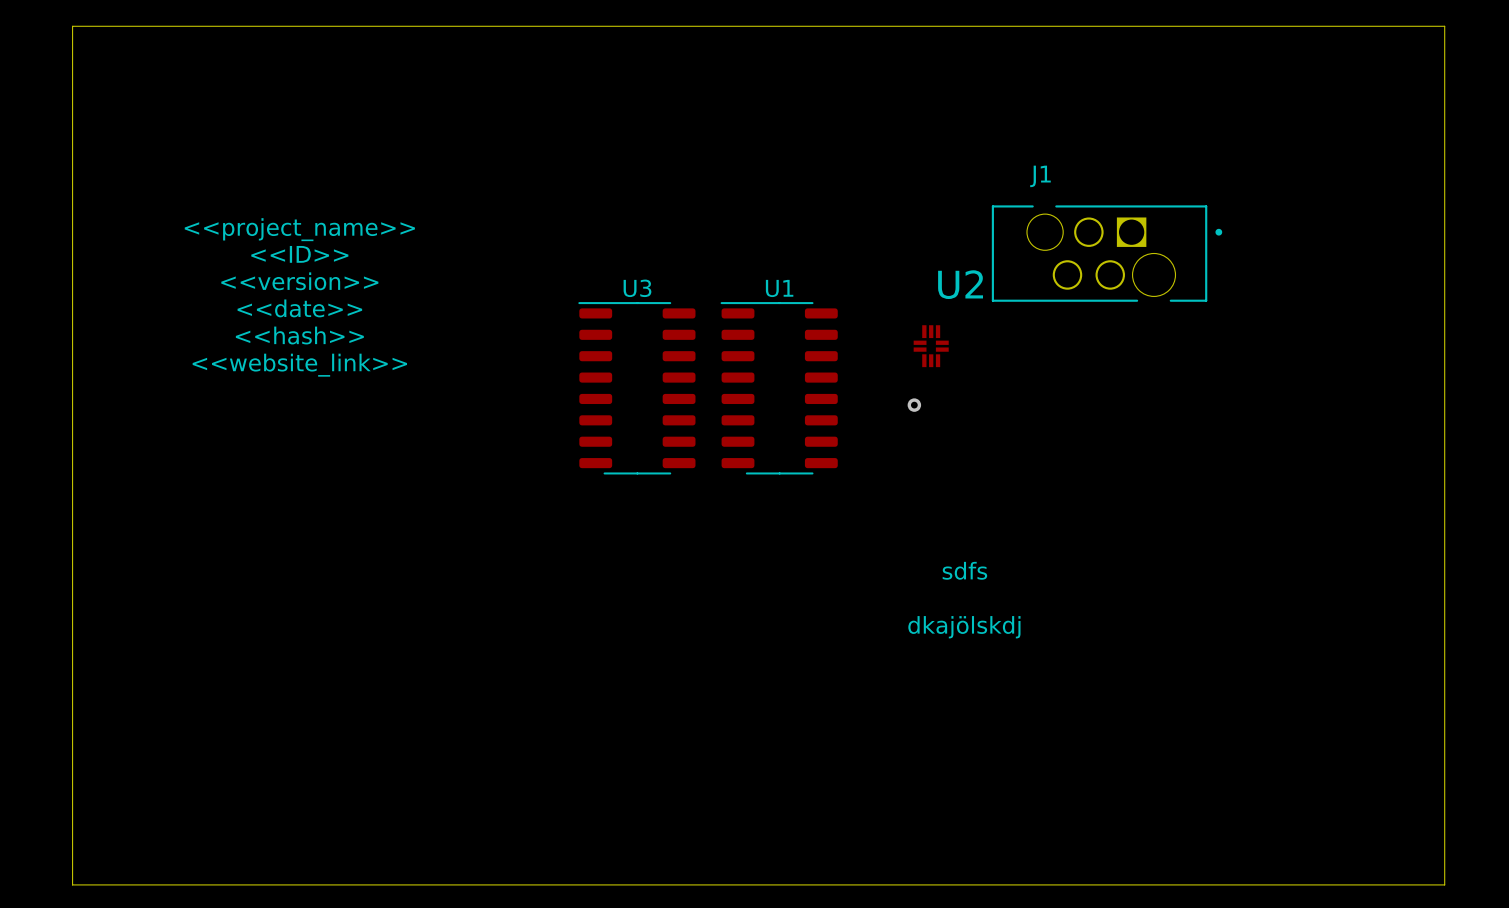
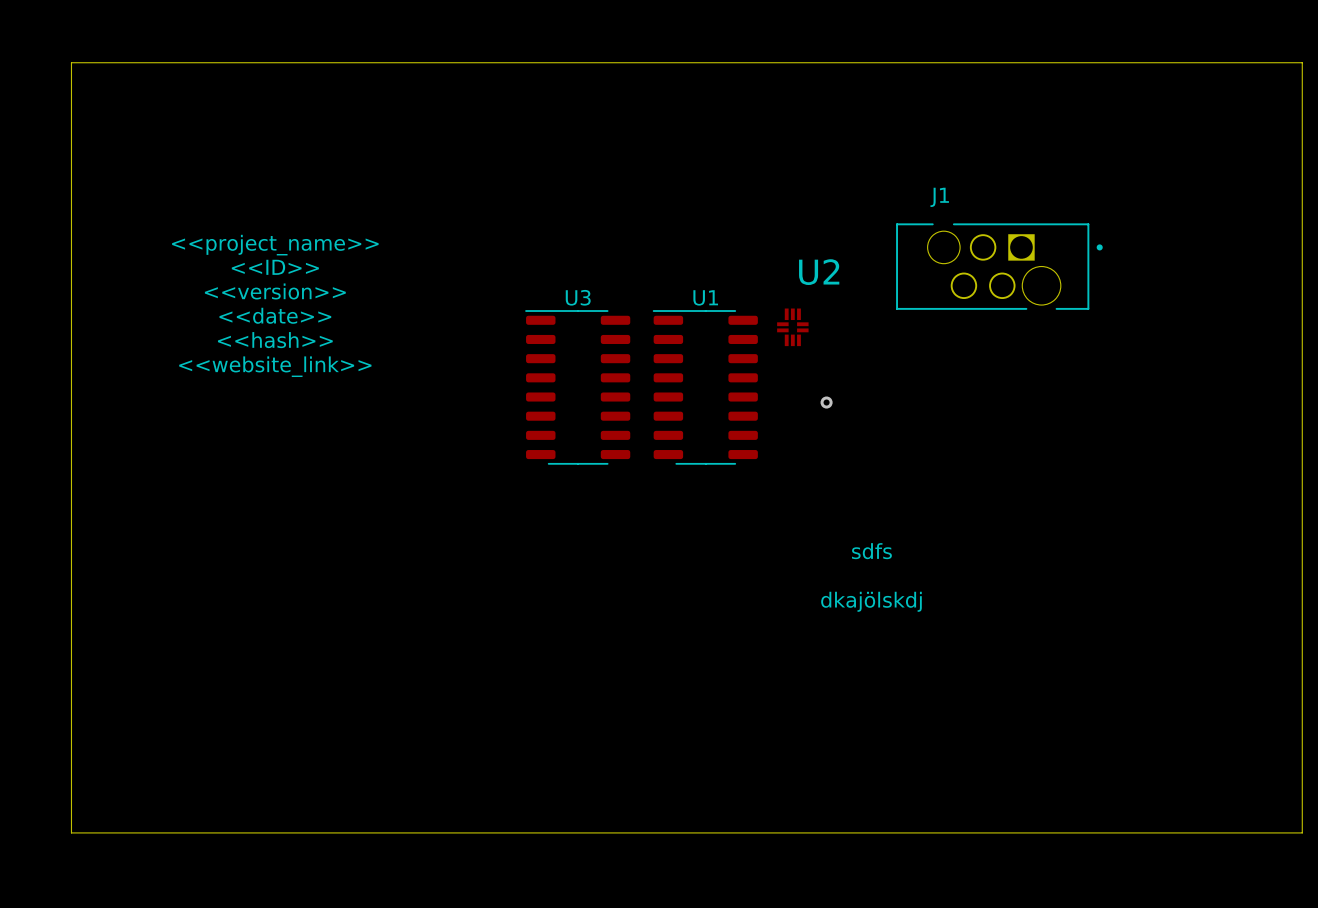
U2 position: (931, 346) -> (792, 327)

